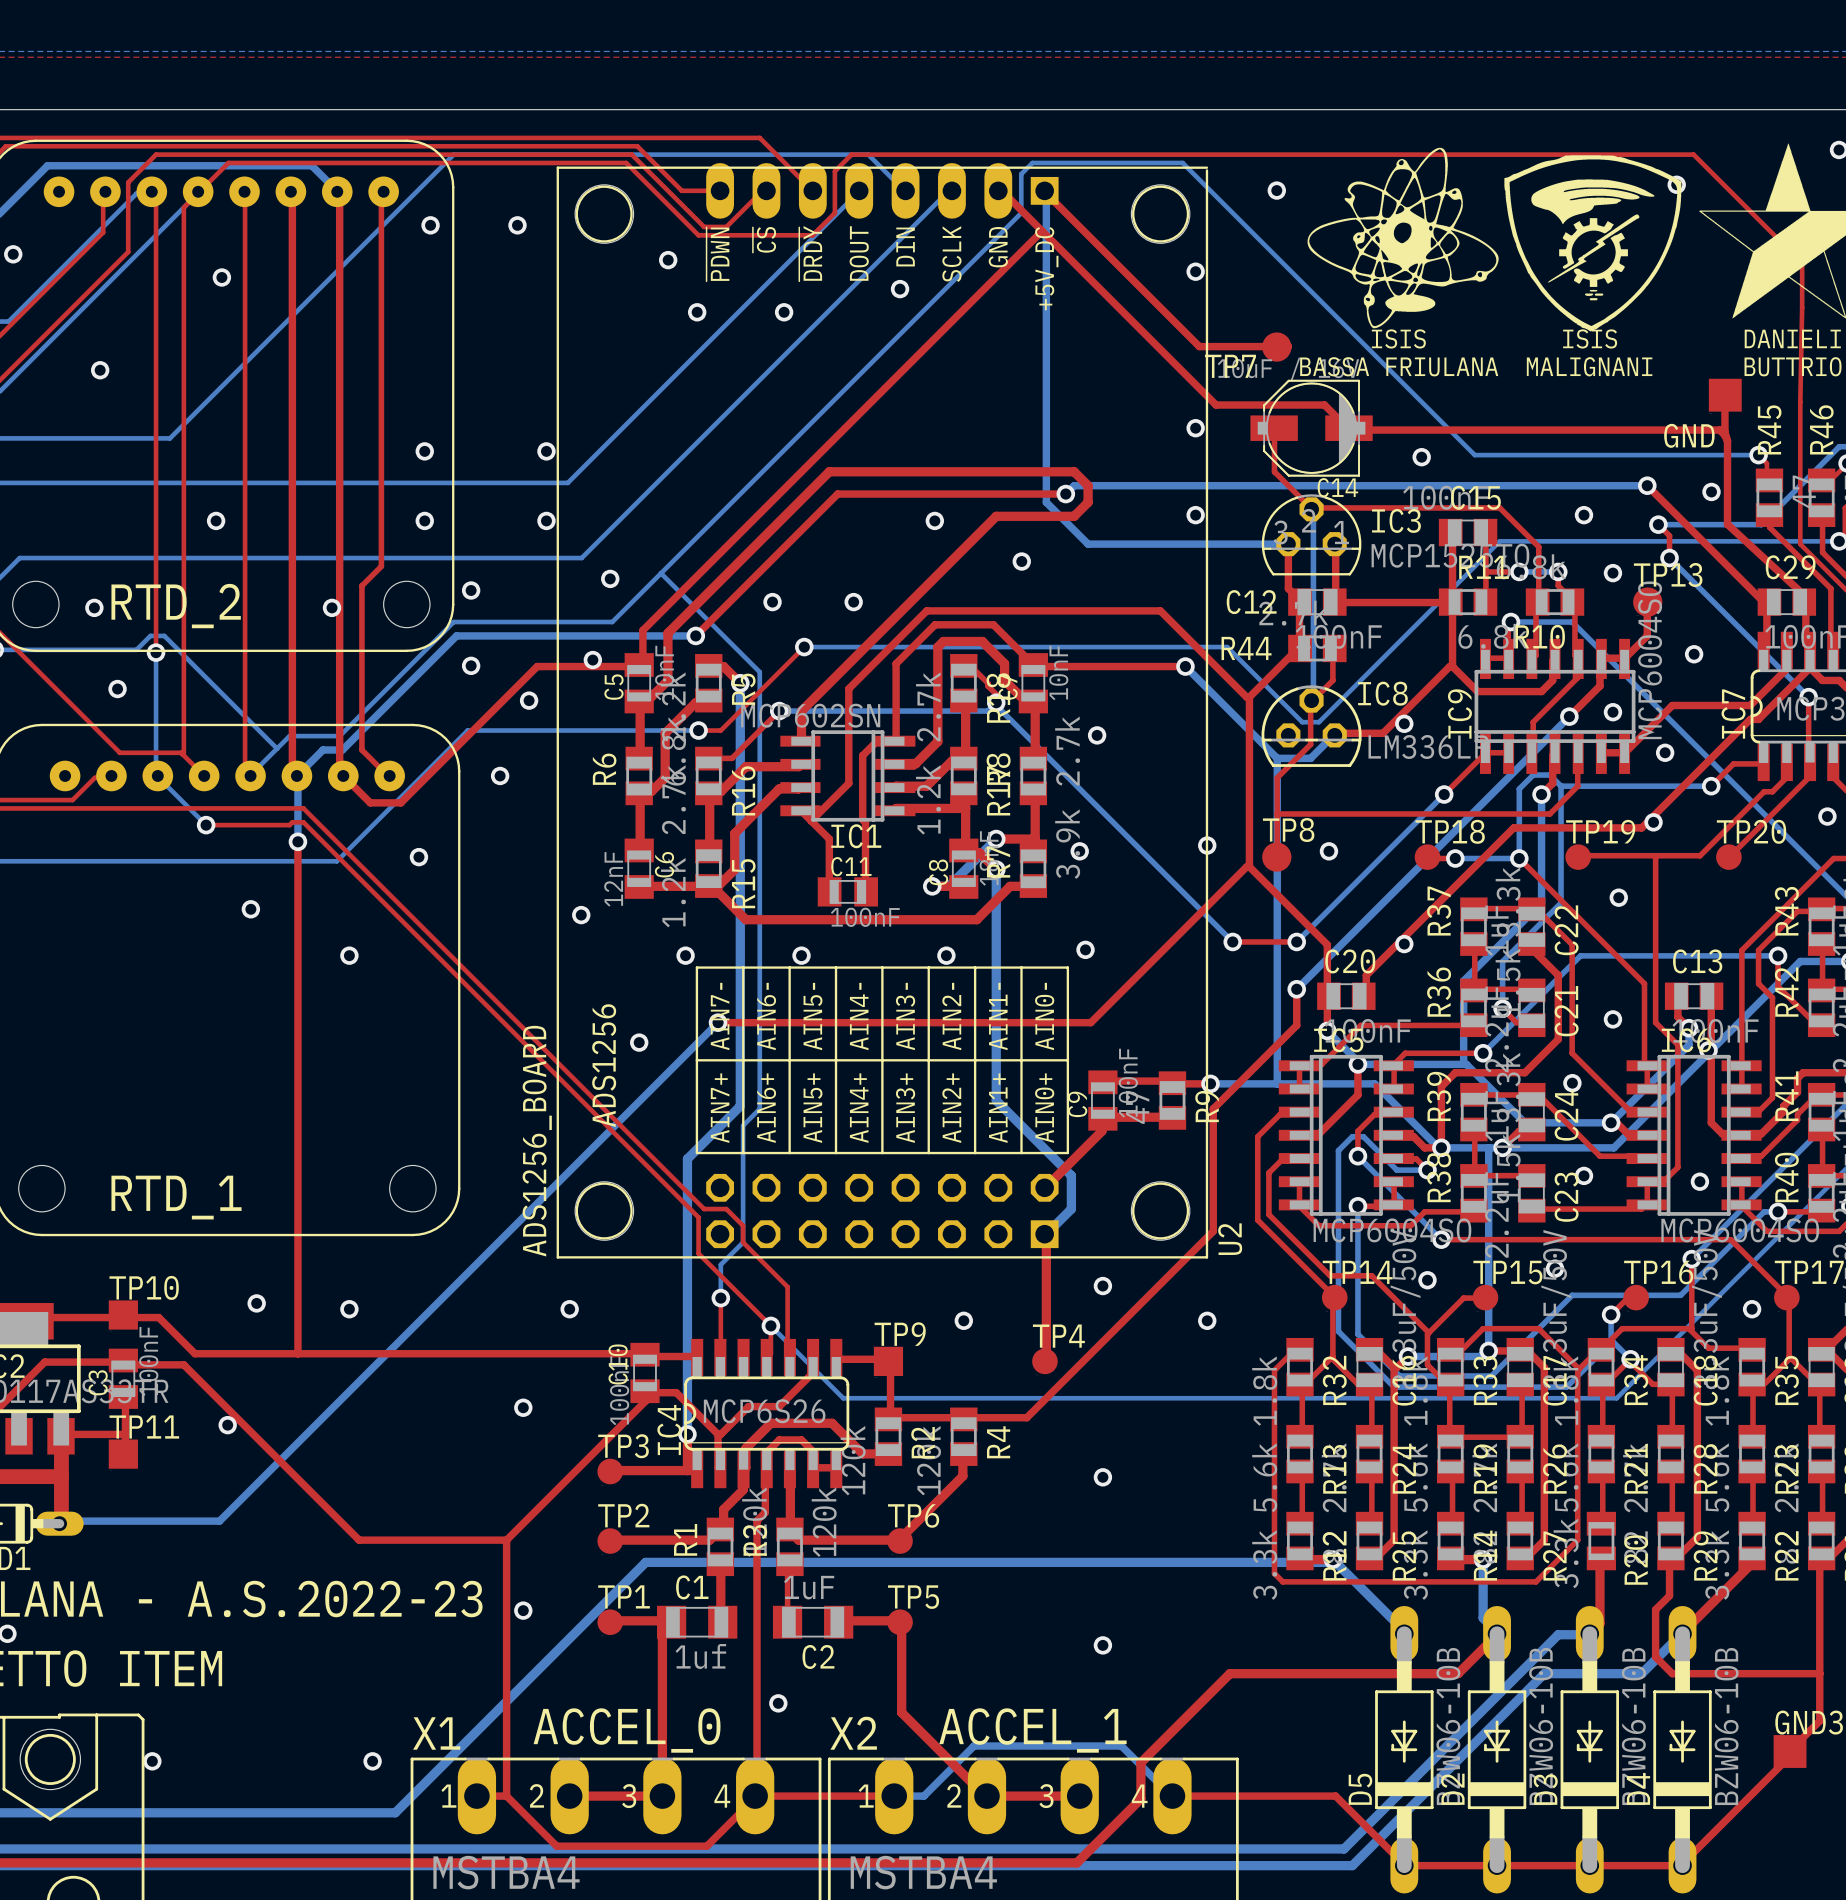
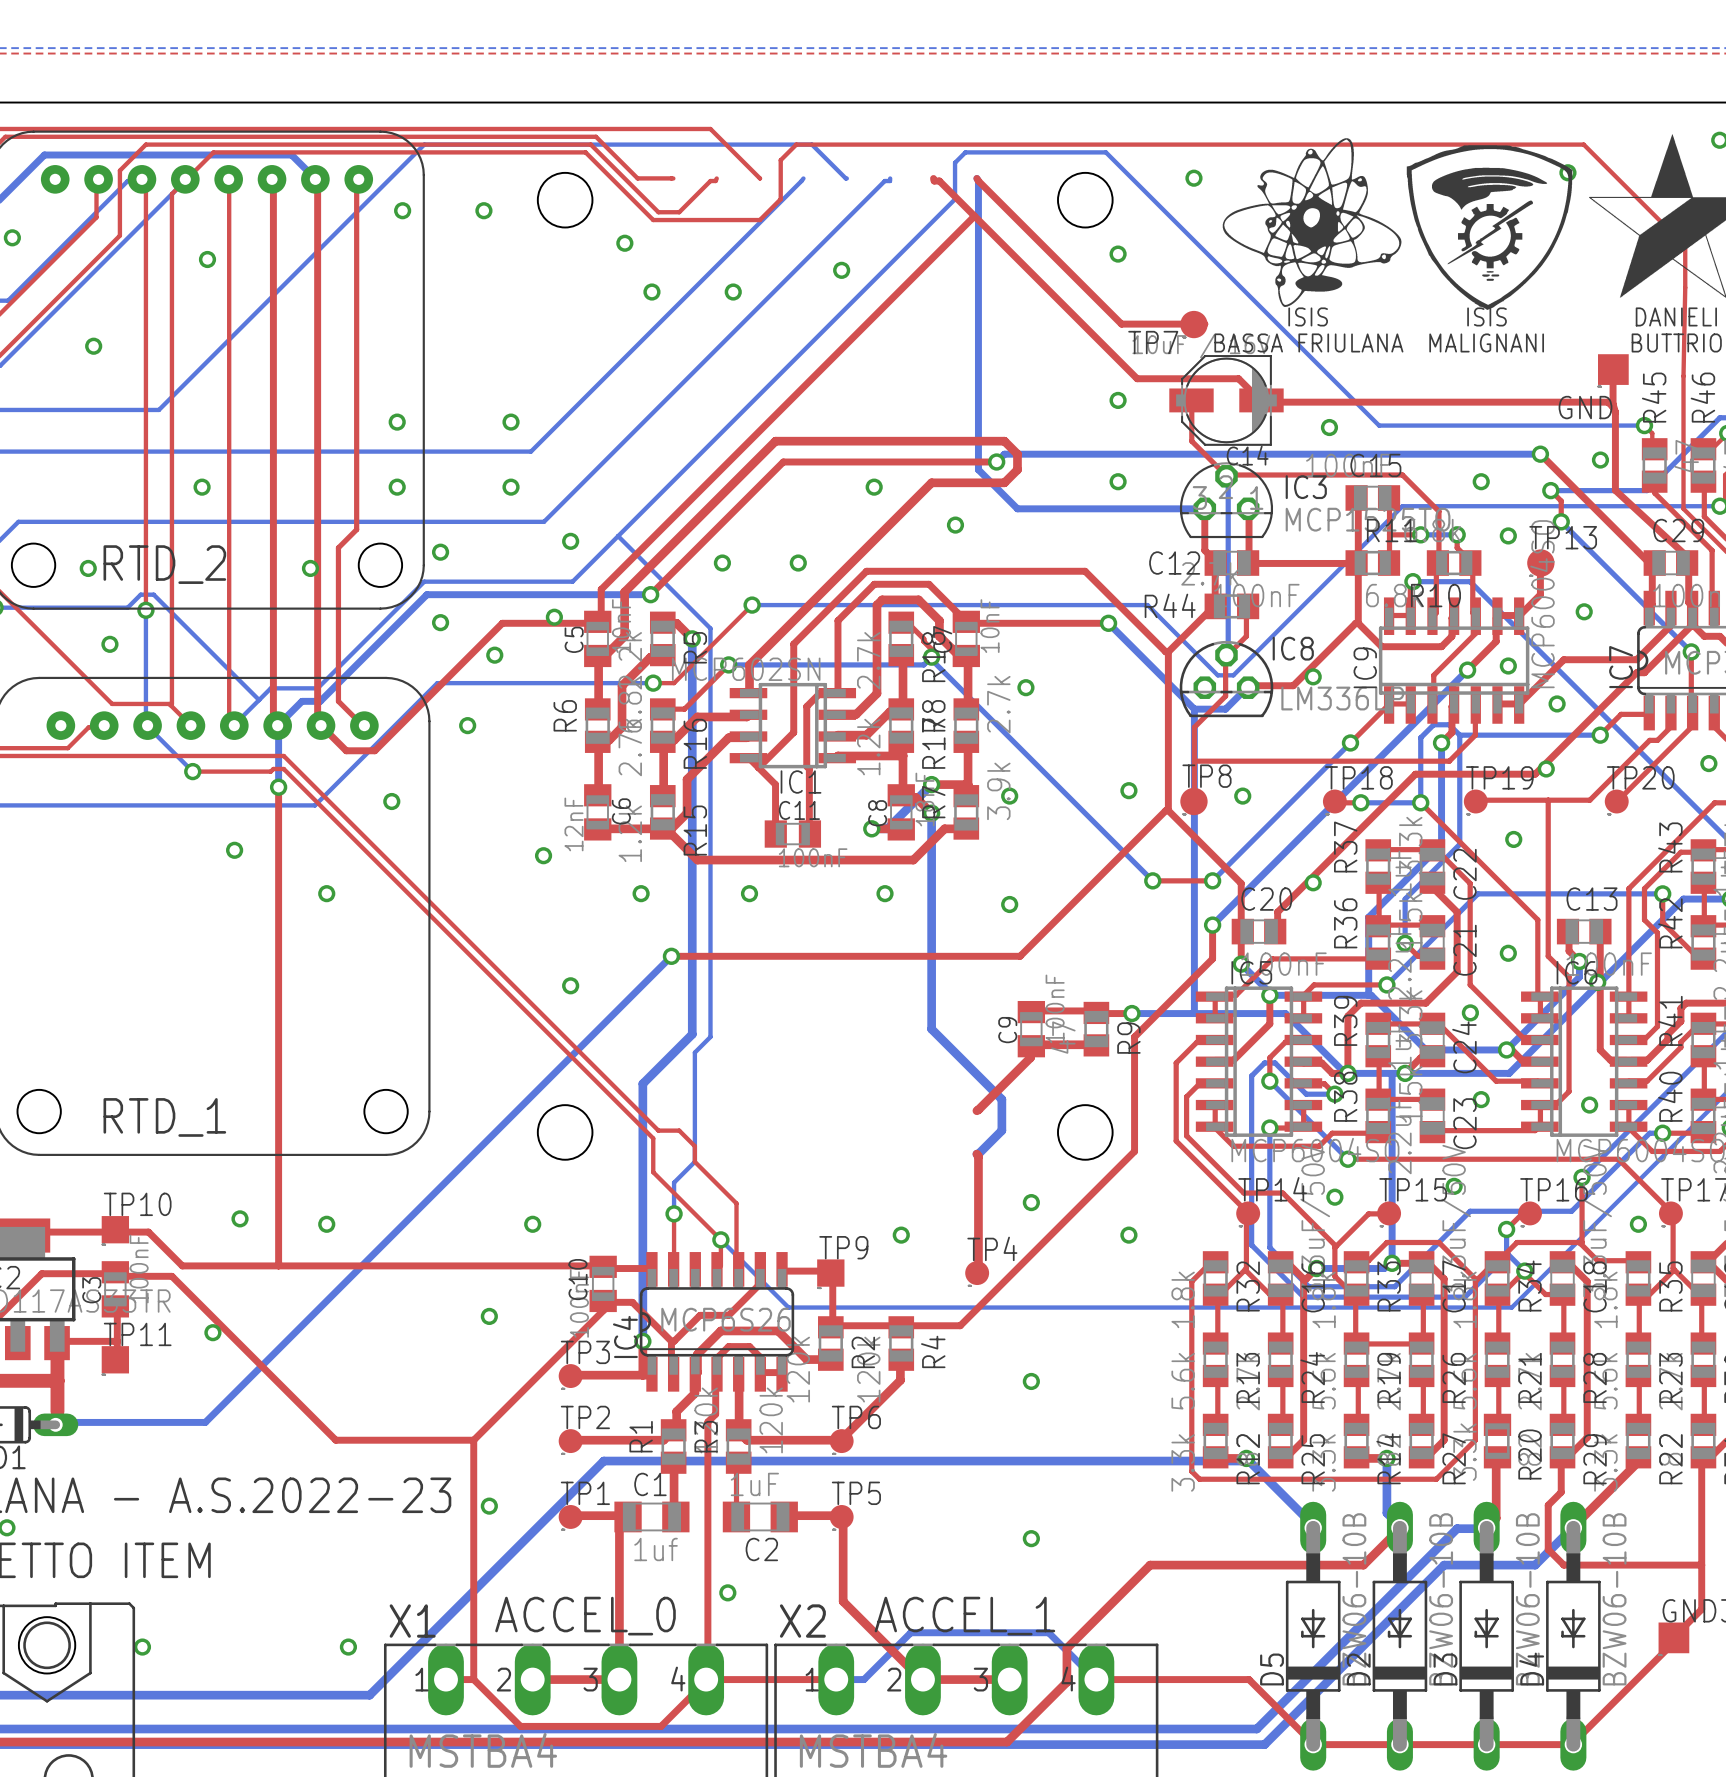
U2: ADS1256_BOARD (882, 710) -> none
via position: (1085, 949) -> (1009, 904)
via position: (639, 1042) -> (570, 985)

